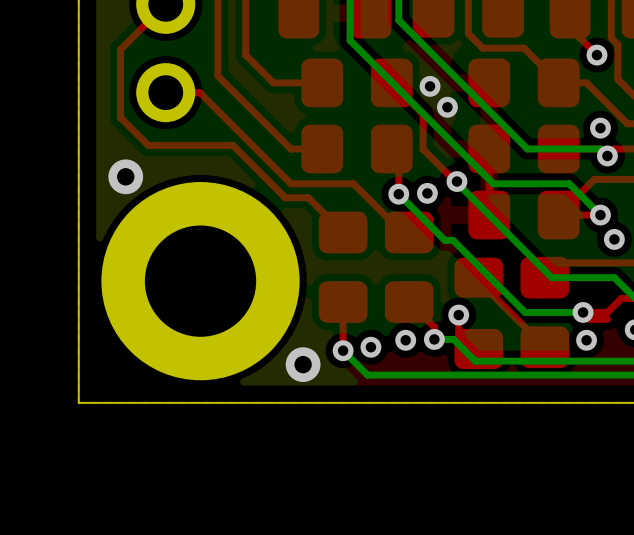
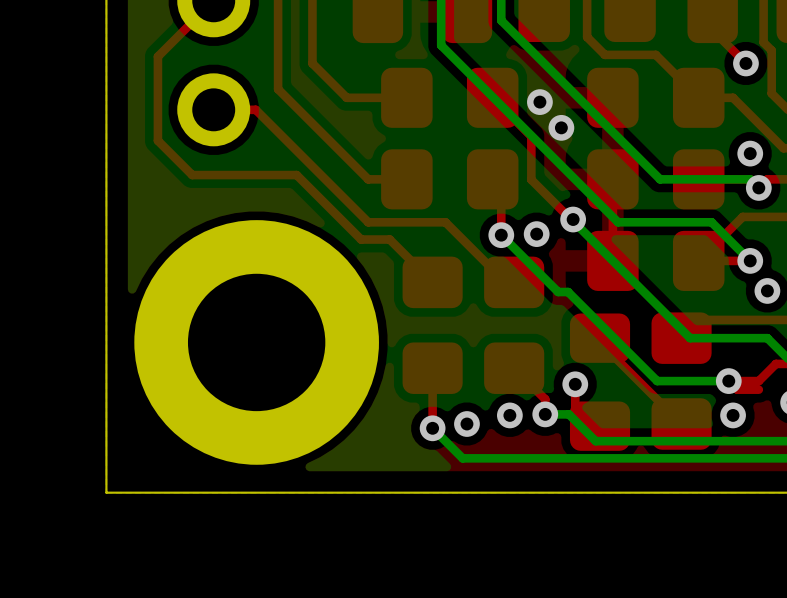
via: (125, 176) -> none
via: (303, 364) -> none

